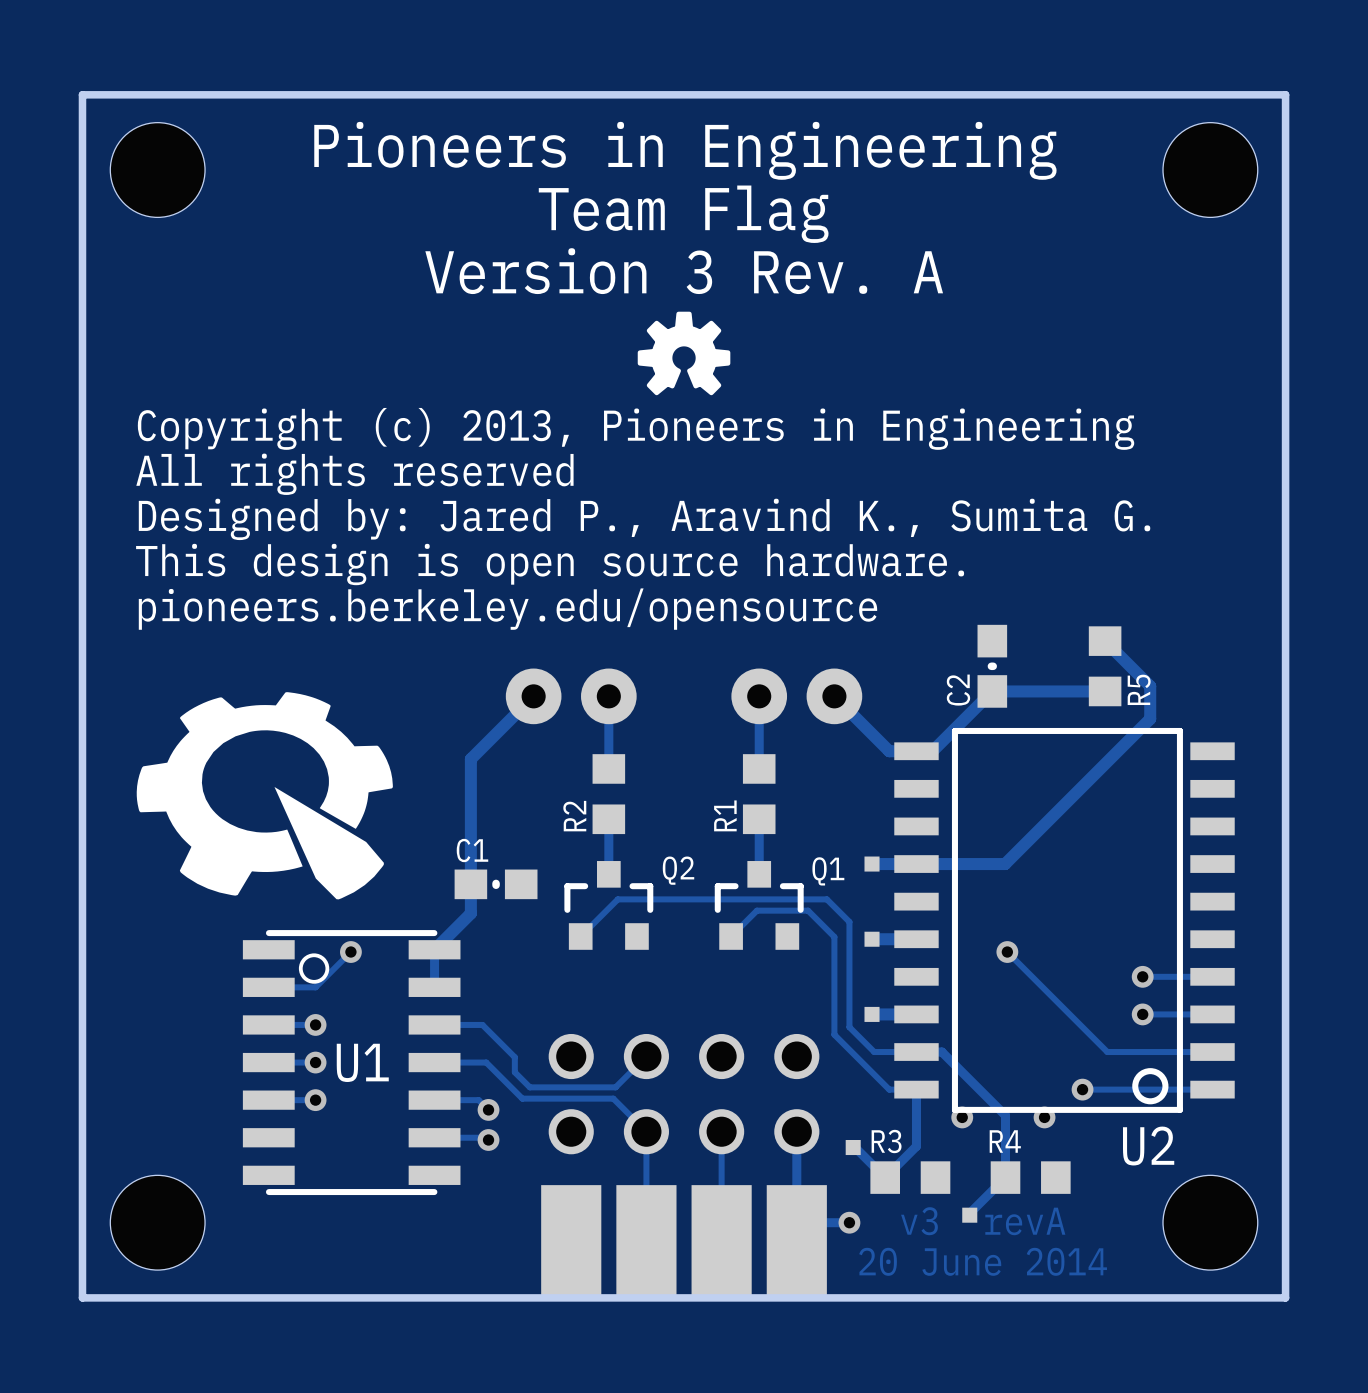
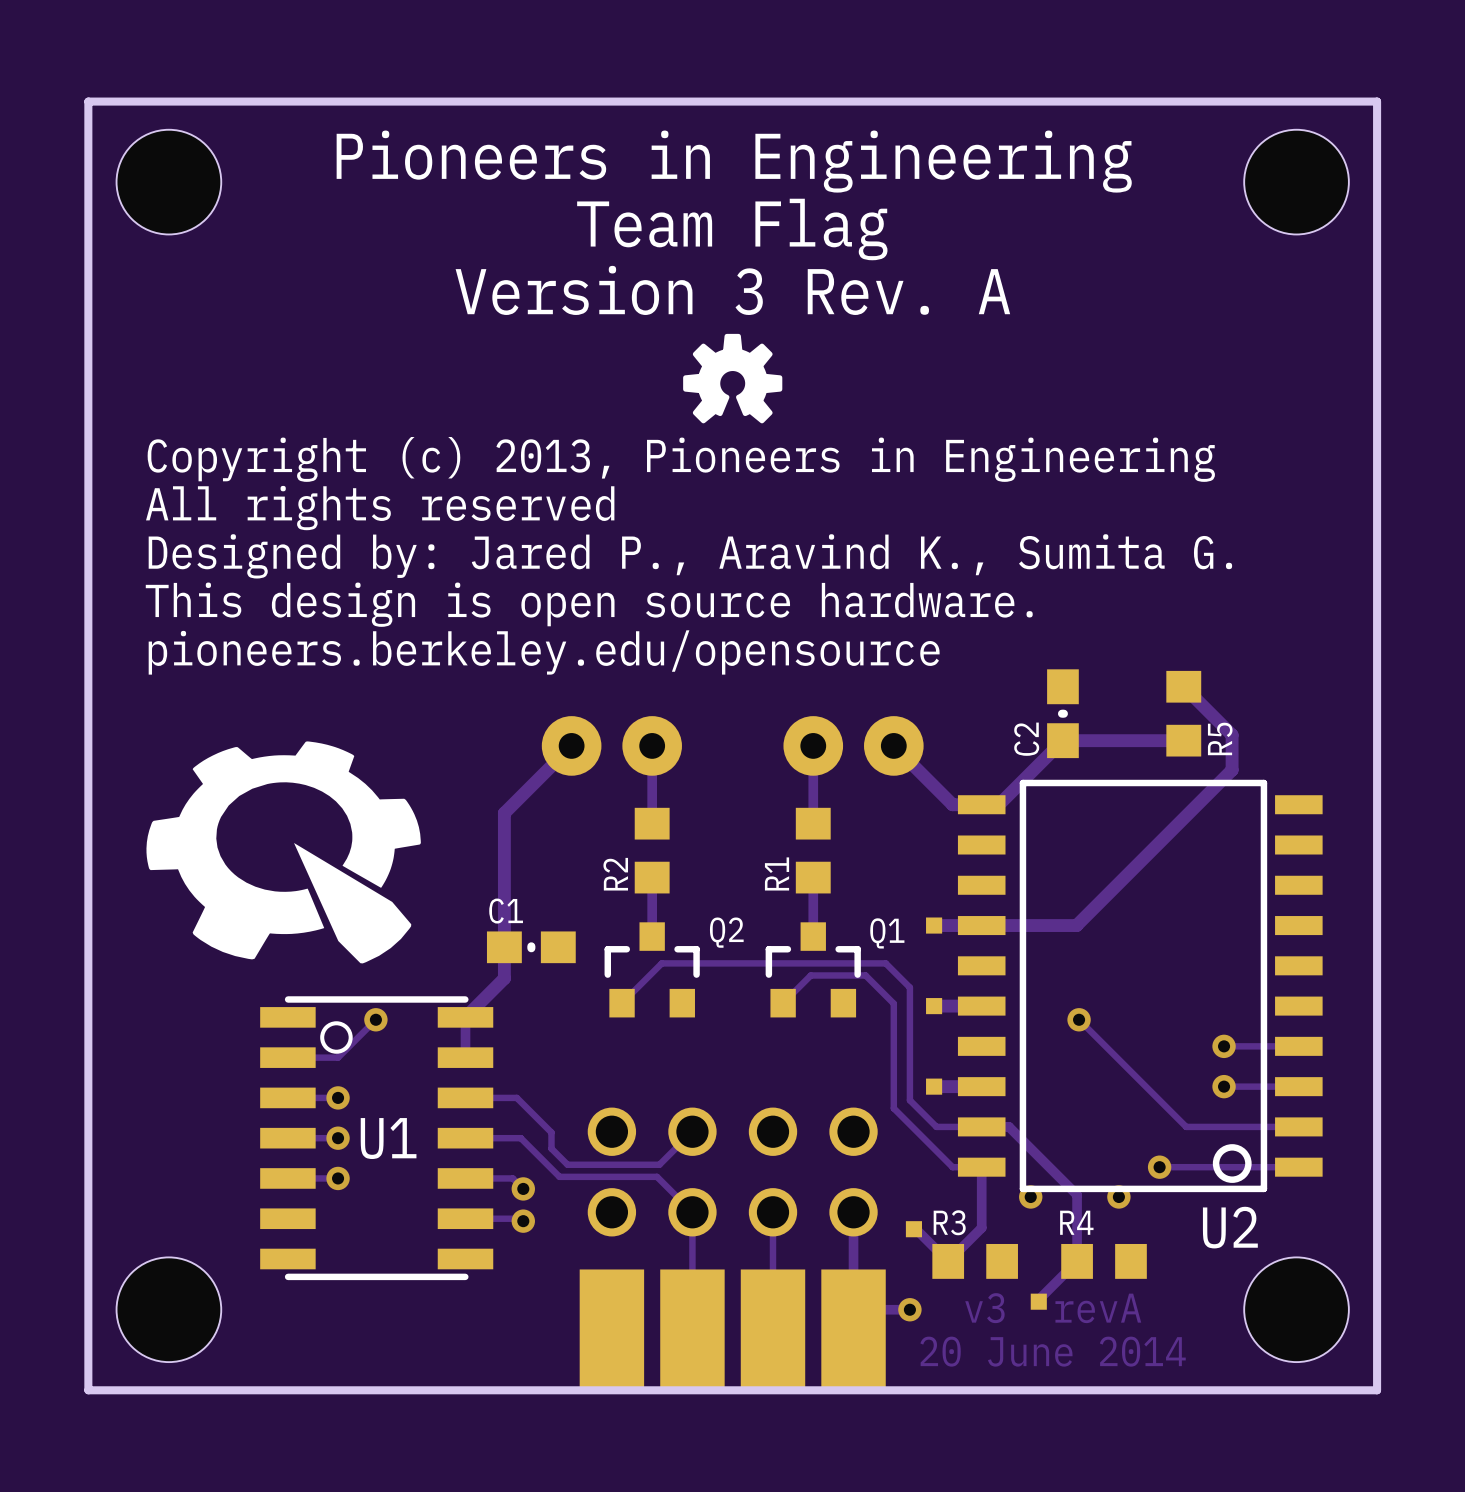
hole: (157, 170) -> none
part: none -> (168, 182)
hole: (1210, 170) -> none
part: none -> (1296, 182)
hole: (157, 1222) -> none
part: none -> (168, 1309)
hole: (1210, 1222) -> none
part: none -> (1296, 1309)

